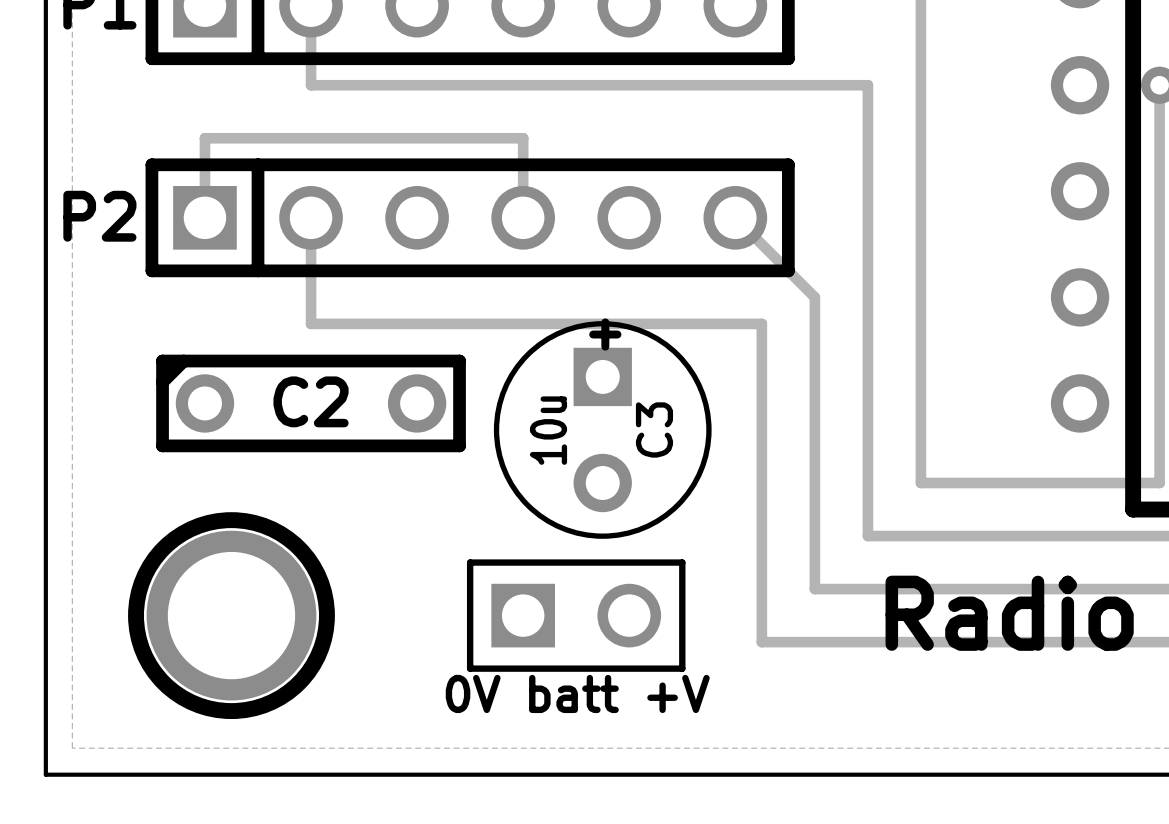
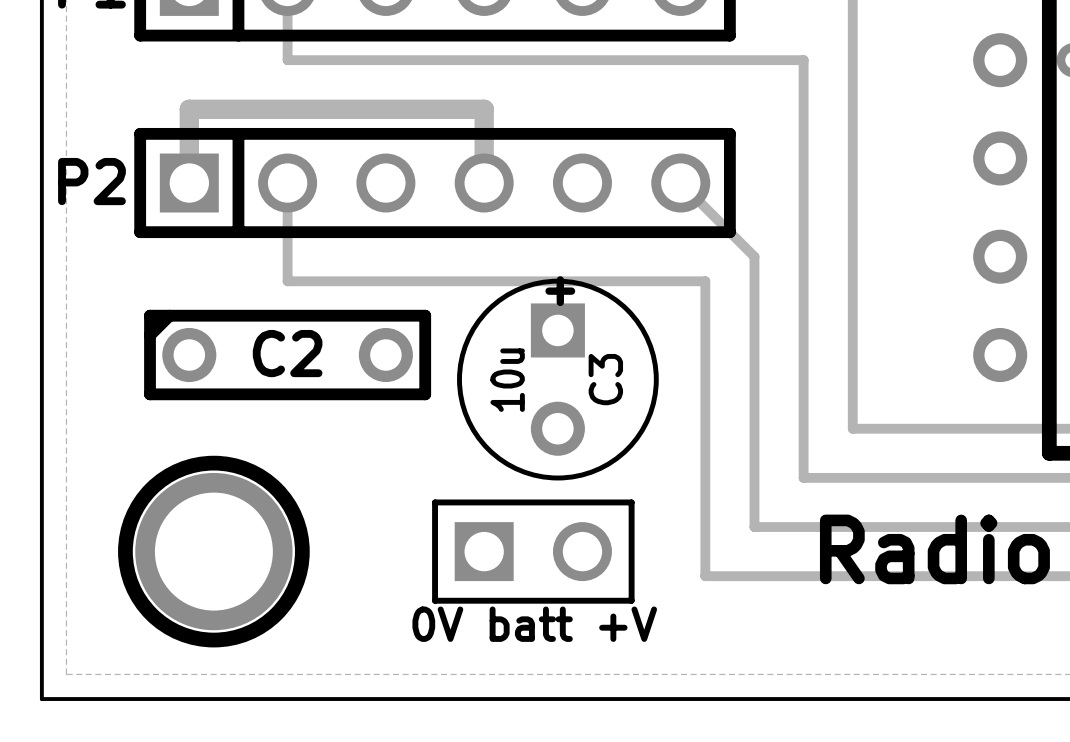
track width: thin (204, 217) (204, 138) (523, 138) (523, 217) -> thick (189, 183) (189, 109) (484, 109) (484, 183)

